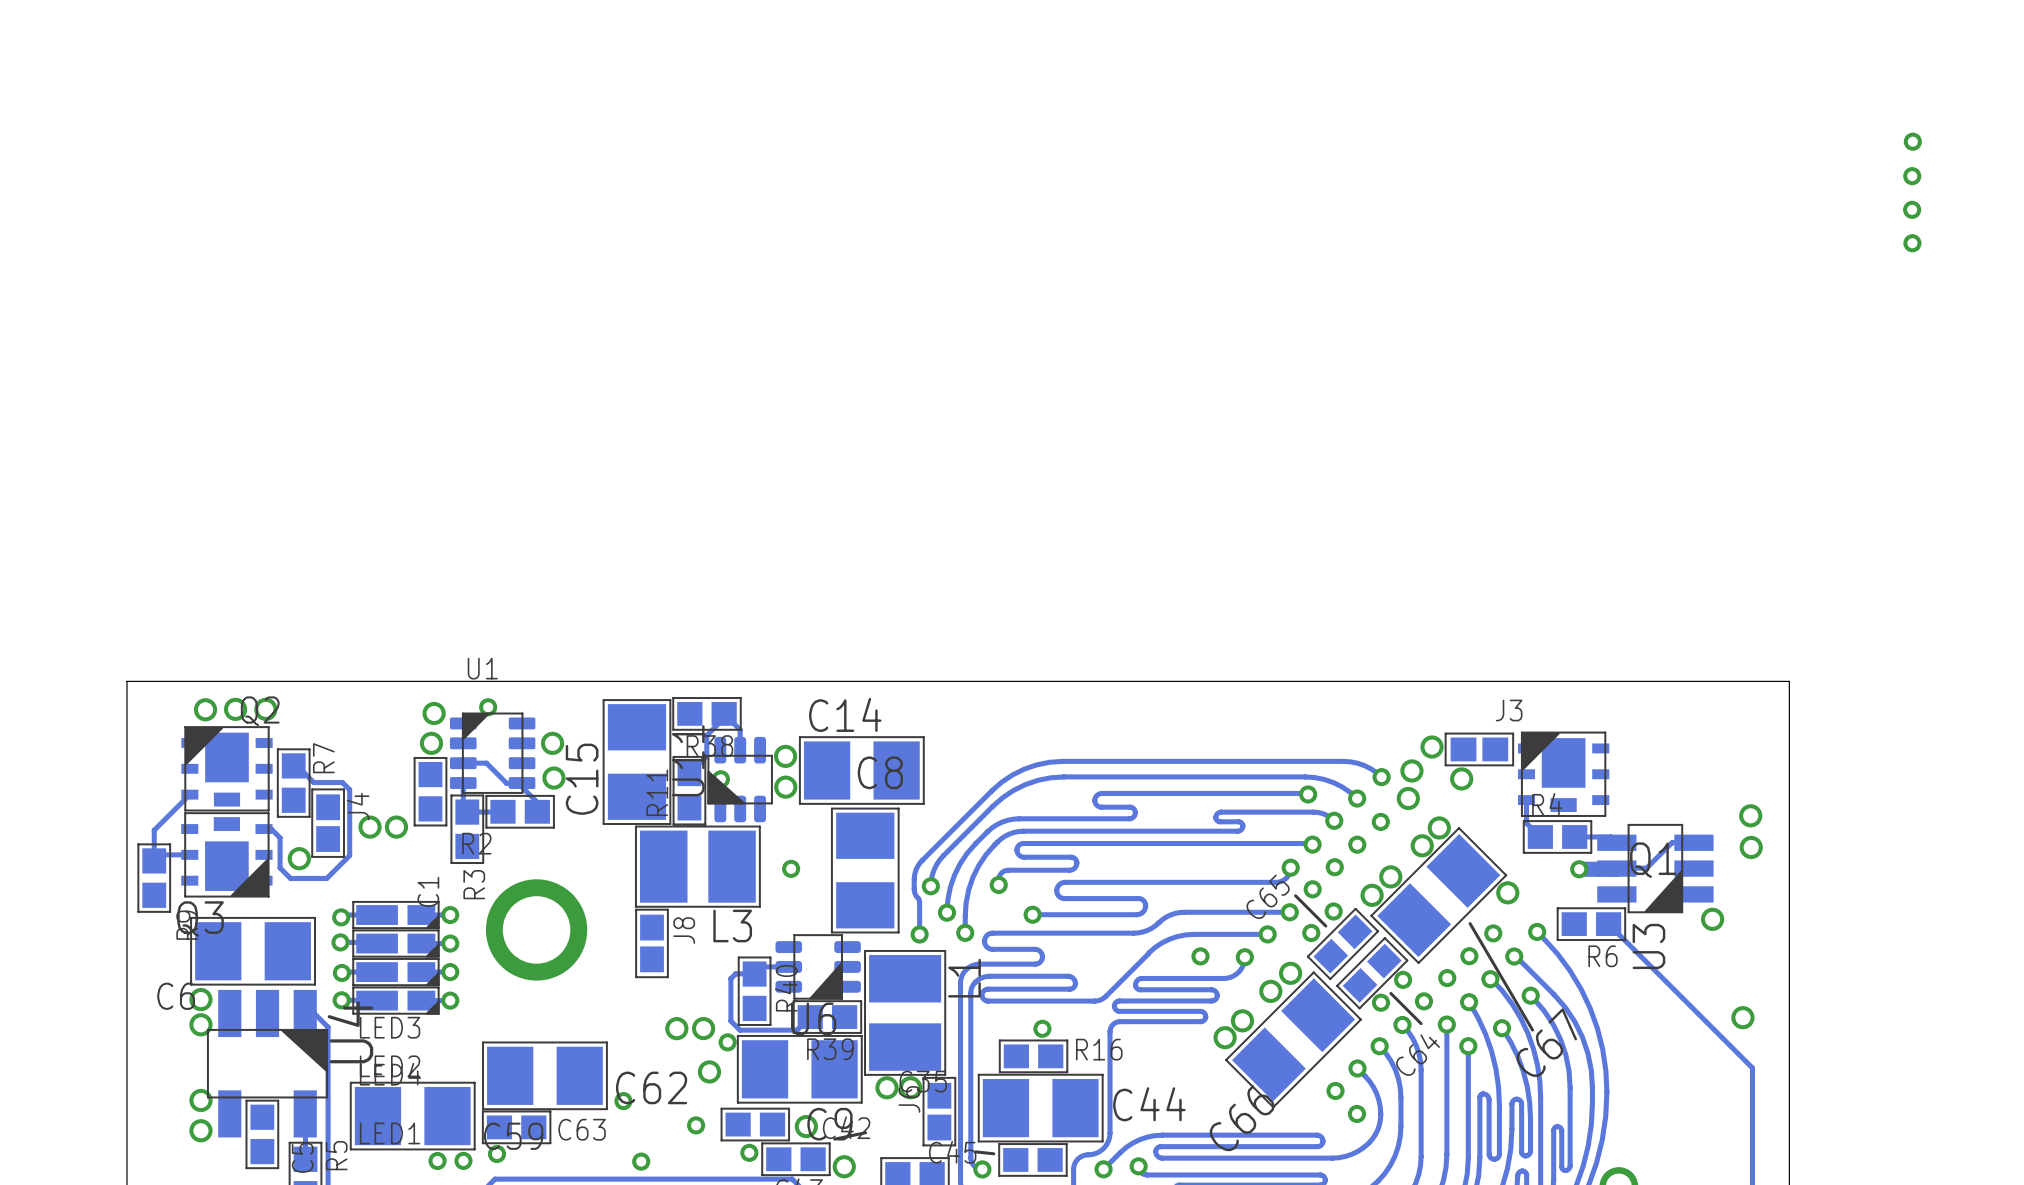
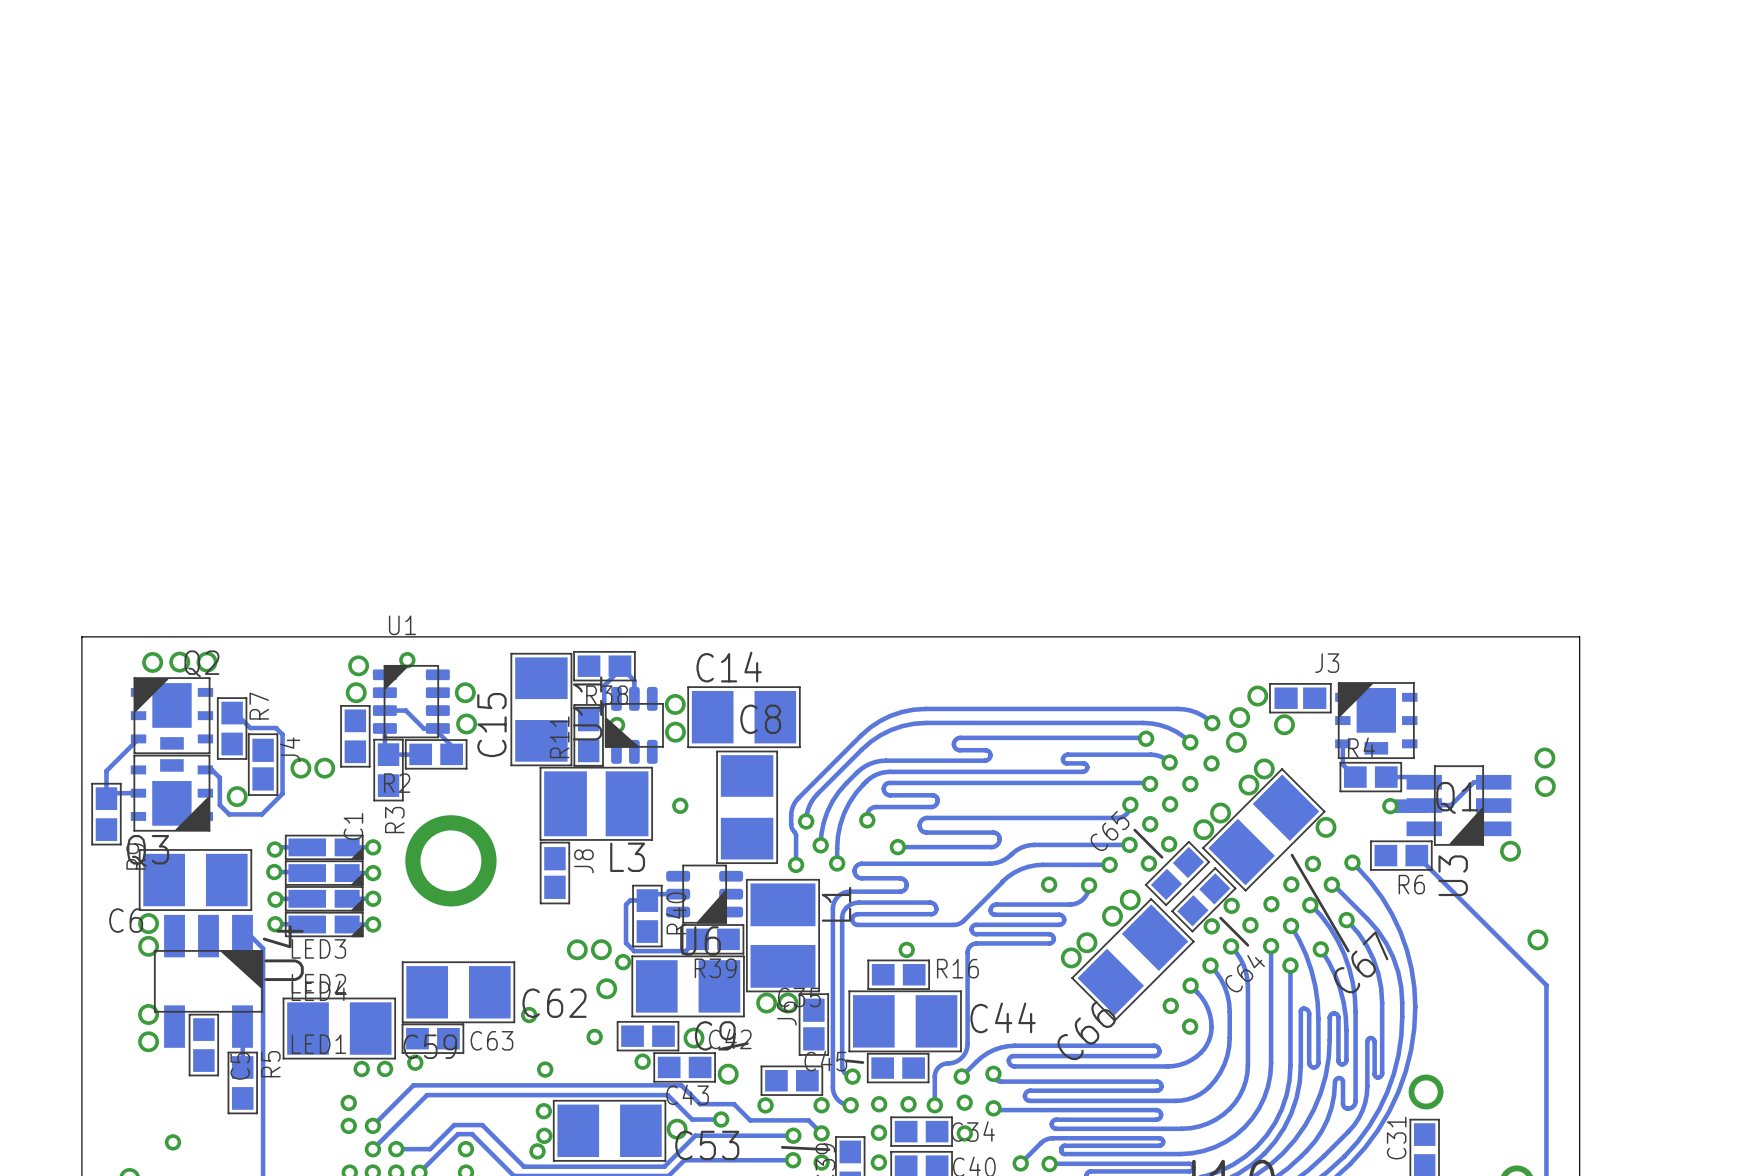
via: (1912, 141) -> none
via: (1912, 176) -> none
via: (1912, 209) -> none
via: (1912, 243) -> none

